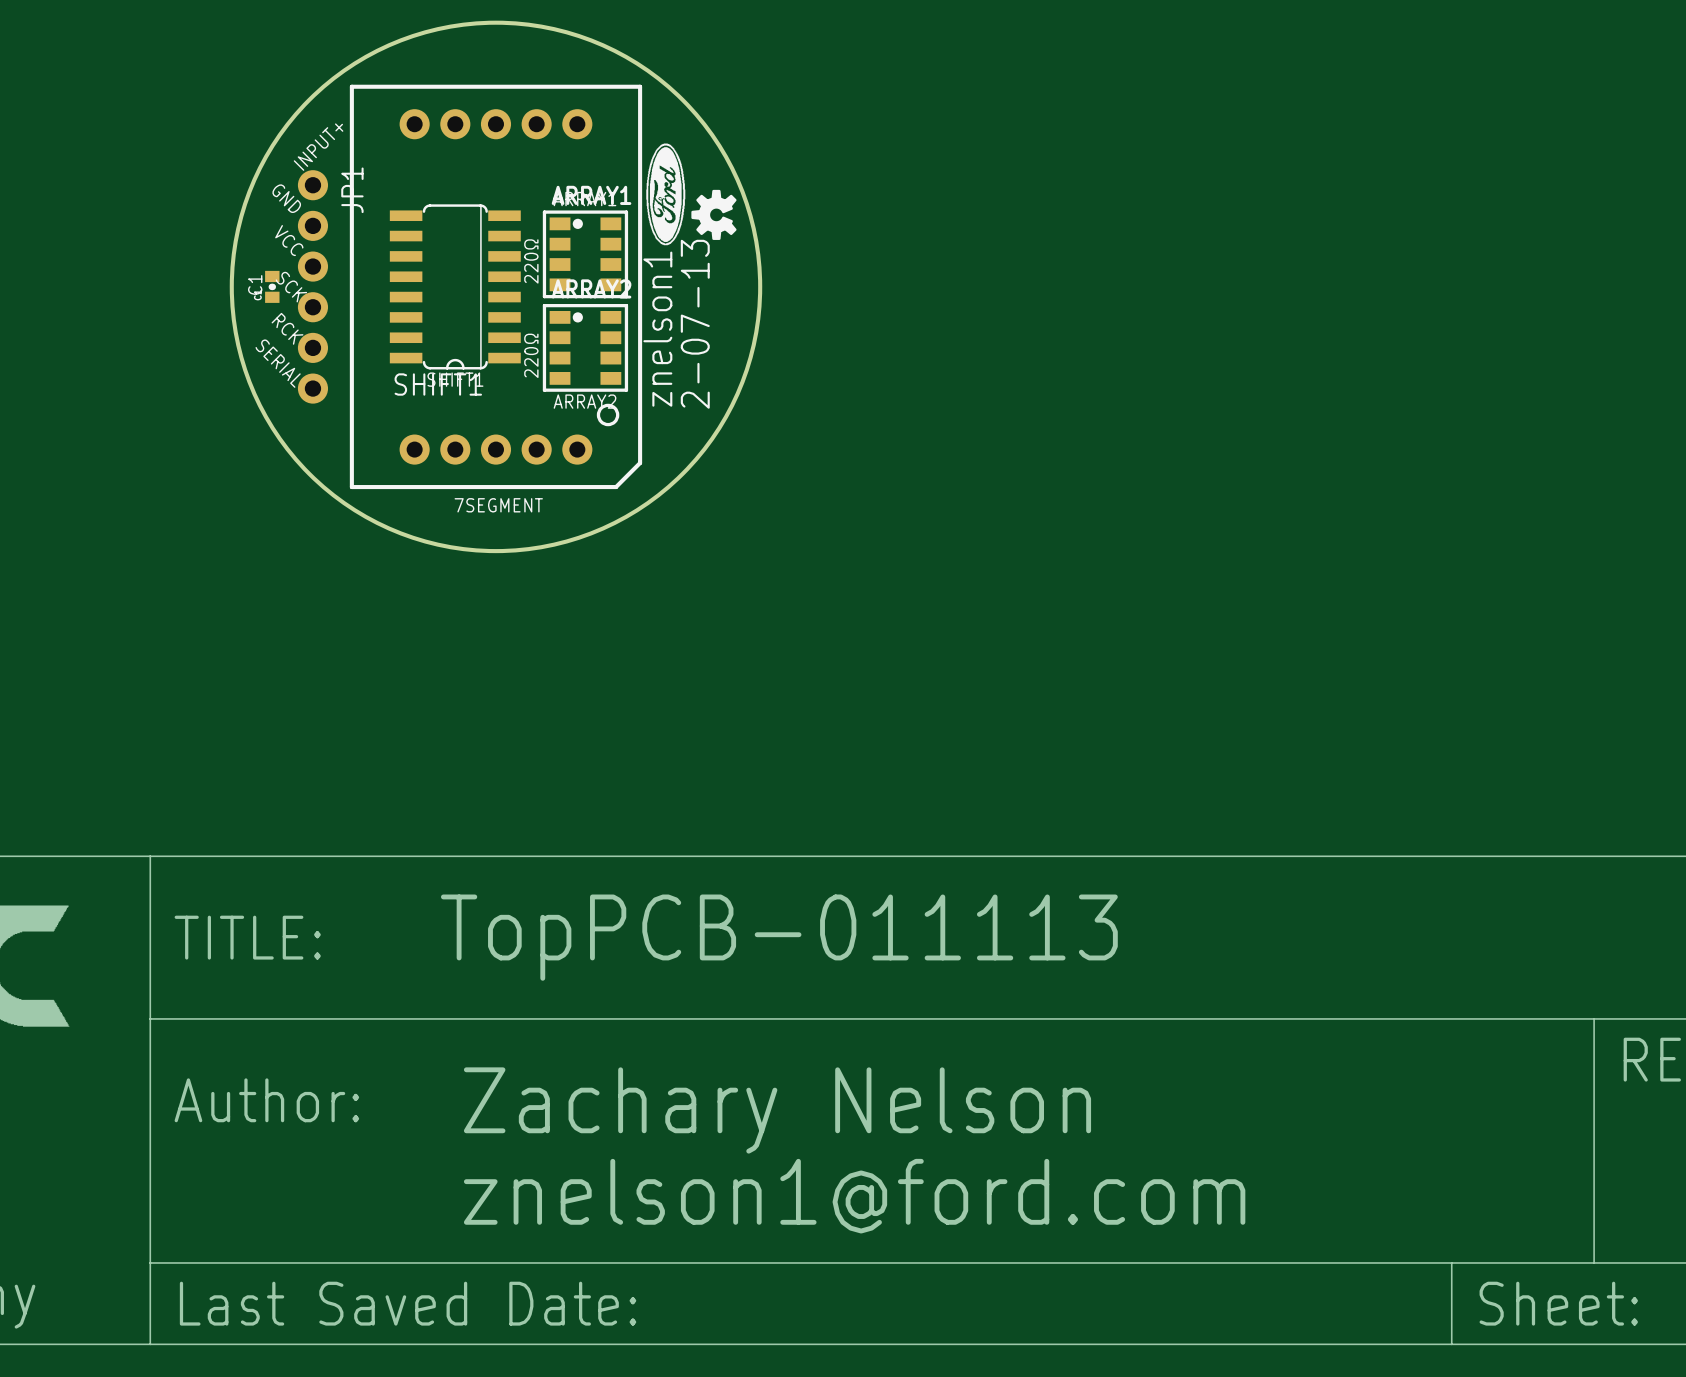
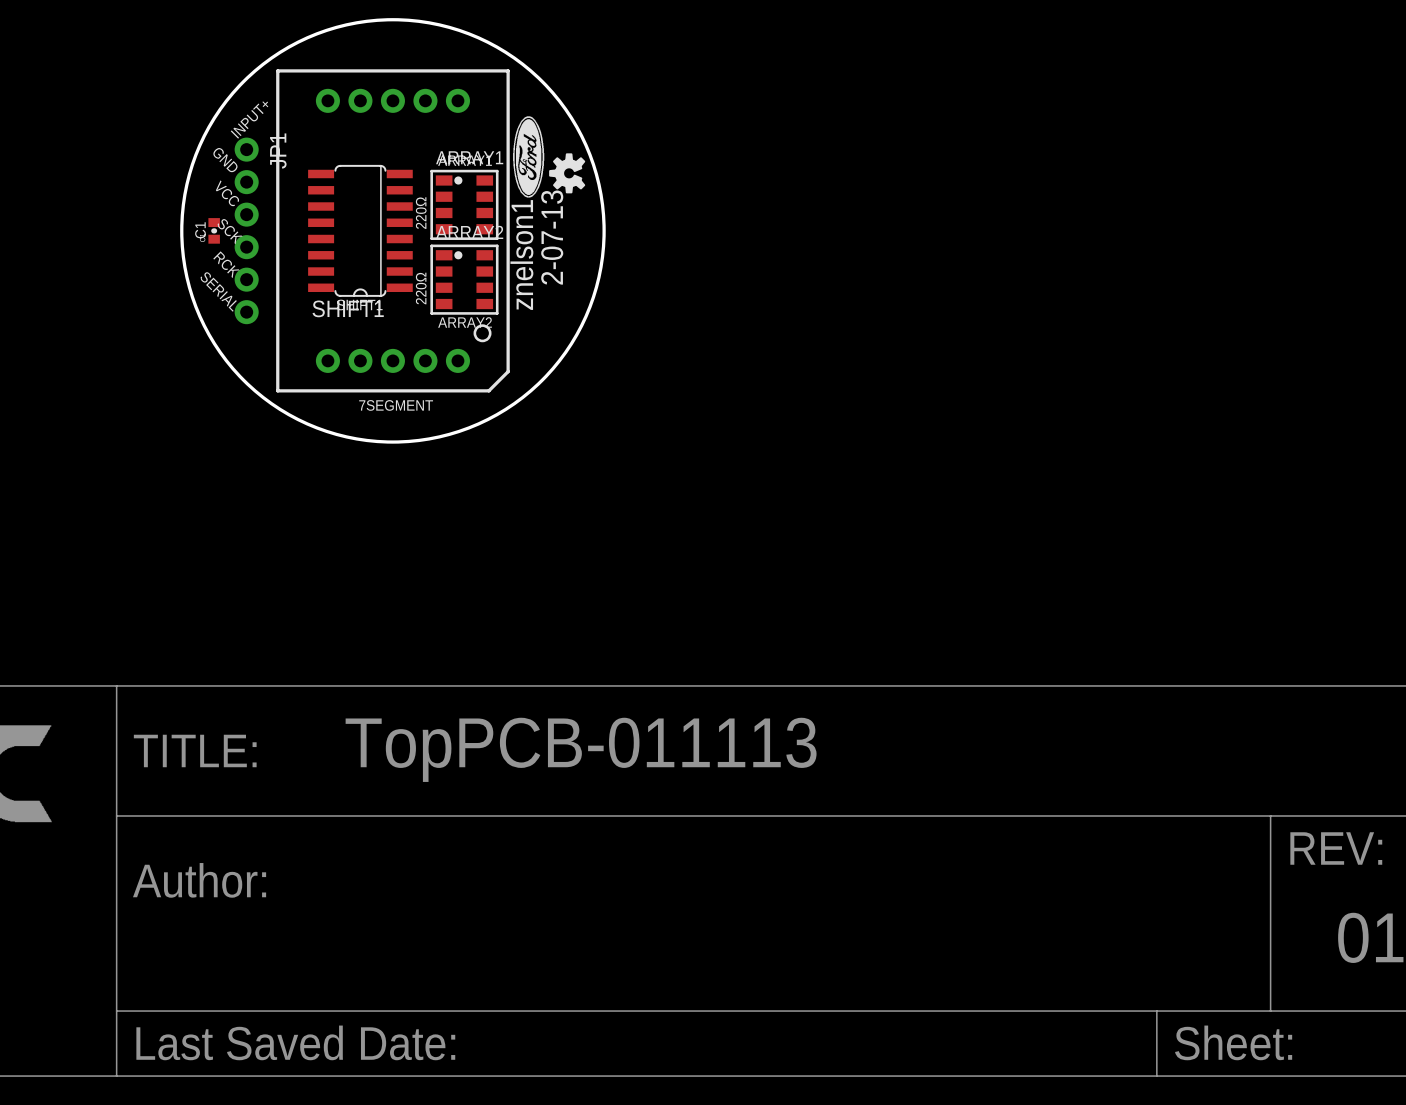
text: Zachary Nelson (777, 1110) -> none
text: znelson1@ford.com (854, 1196) -> none

